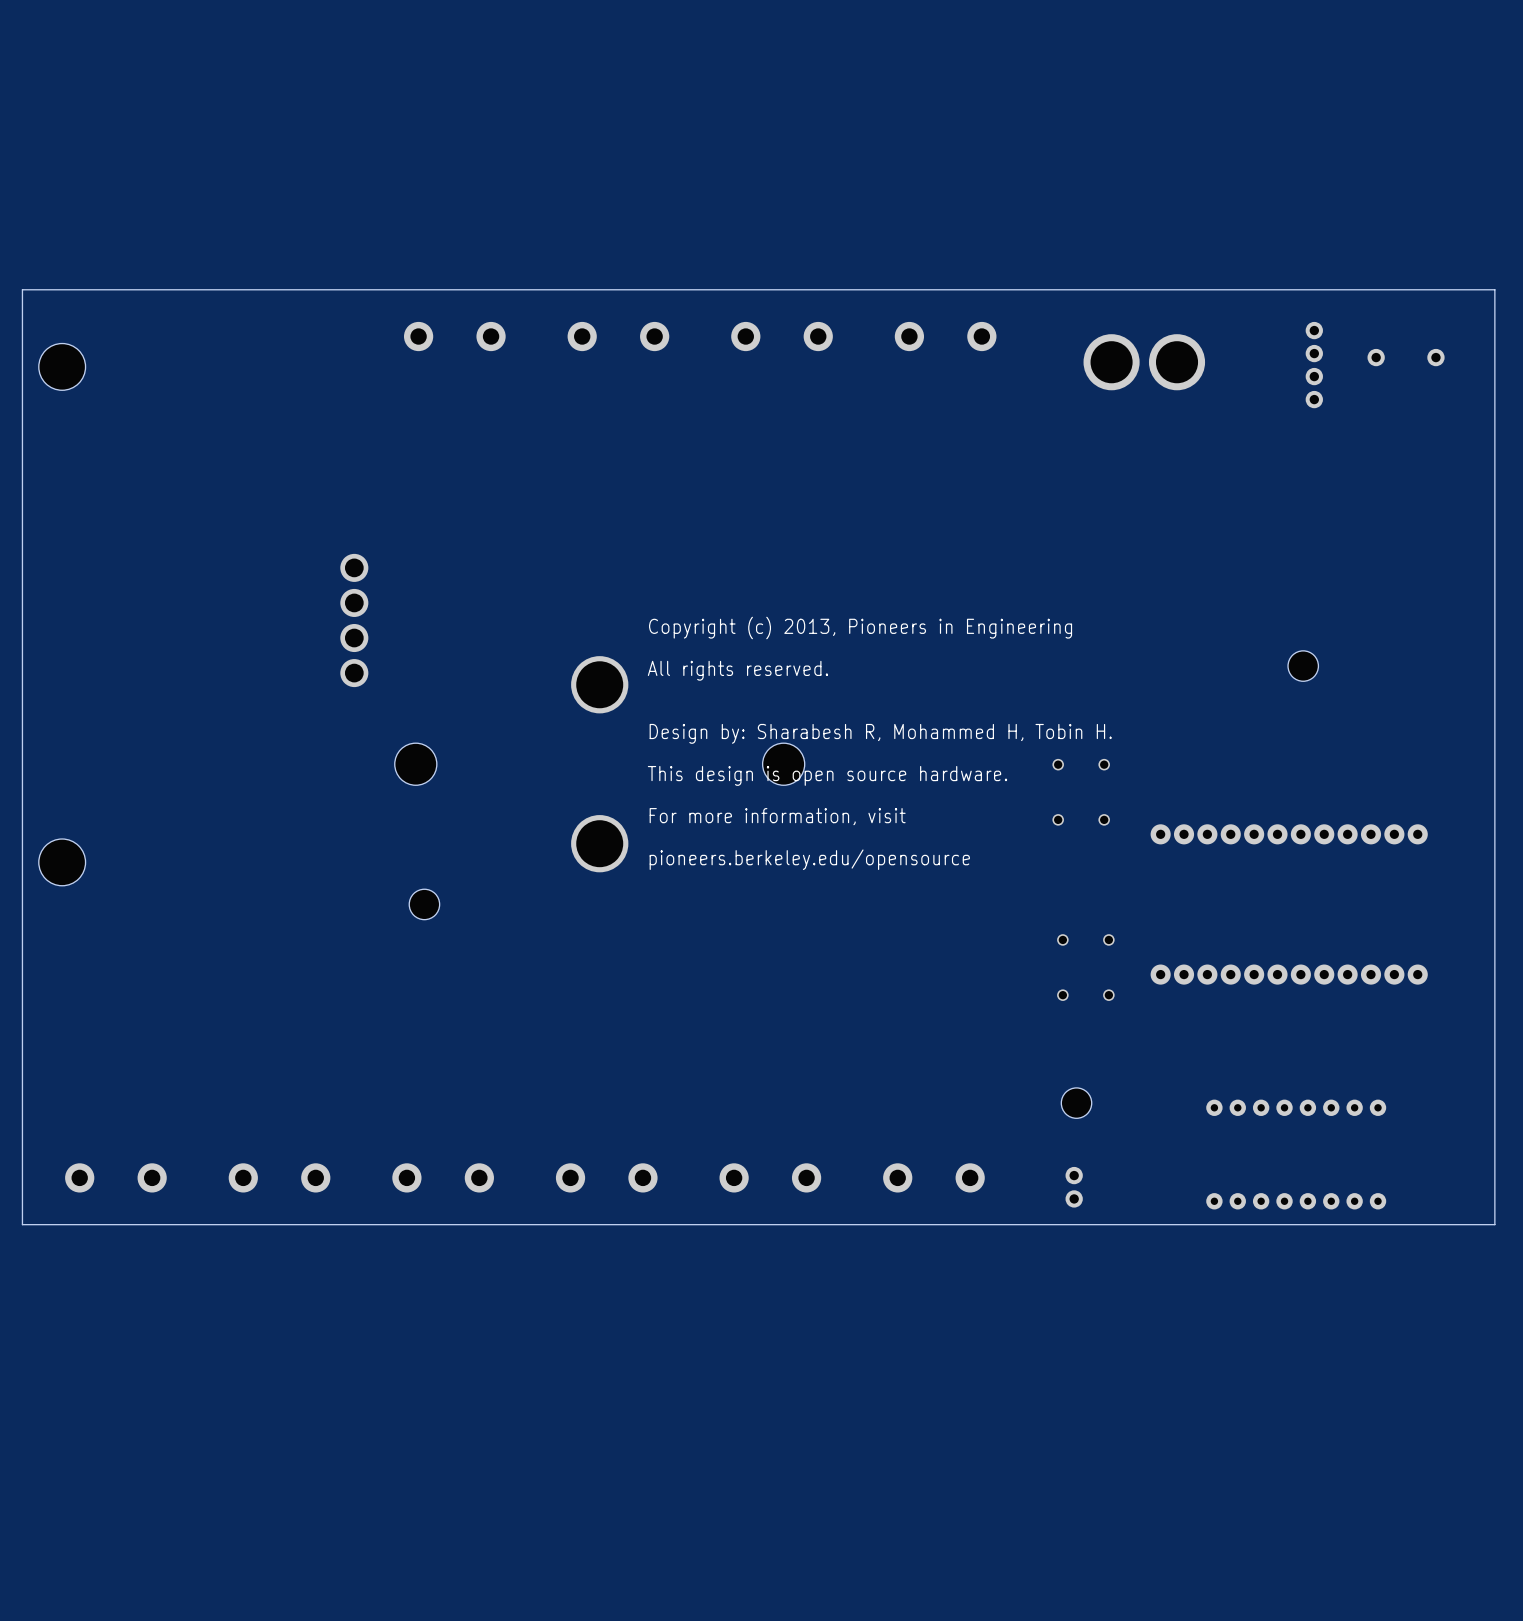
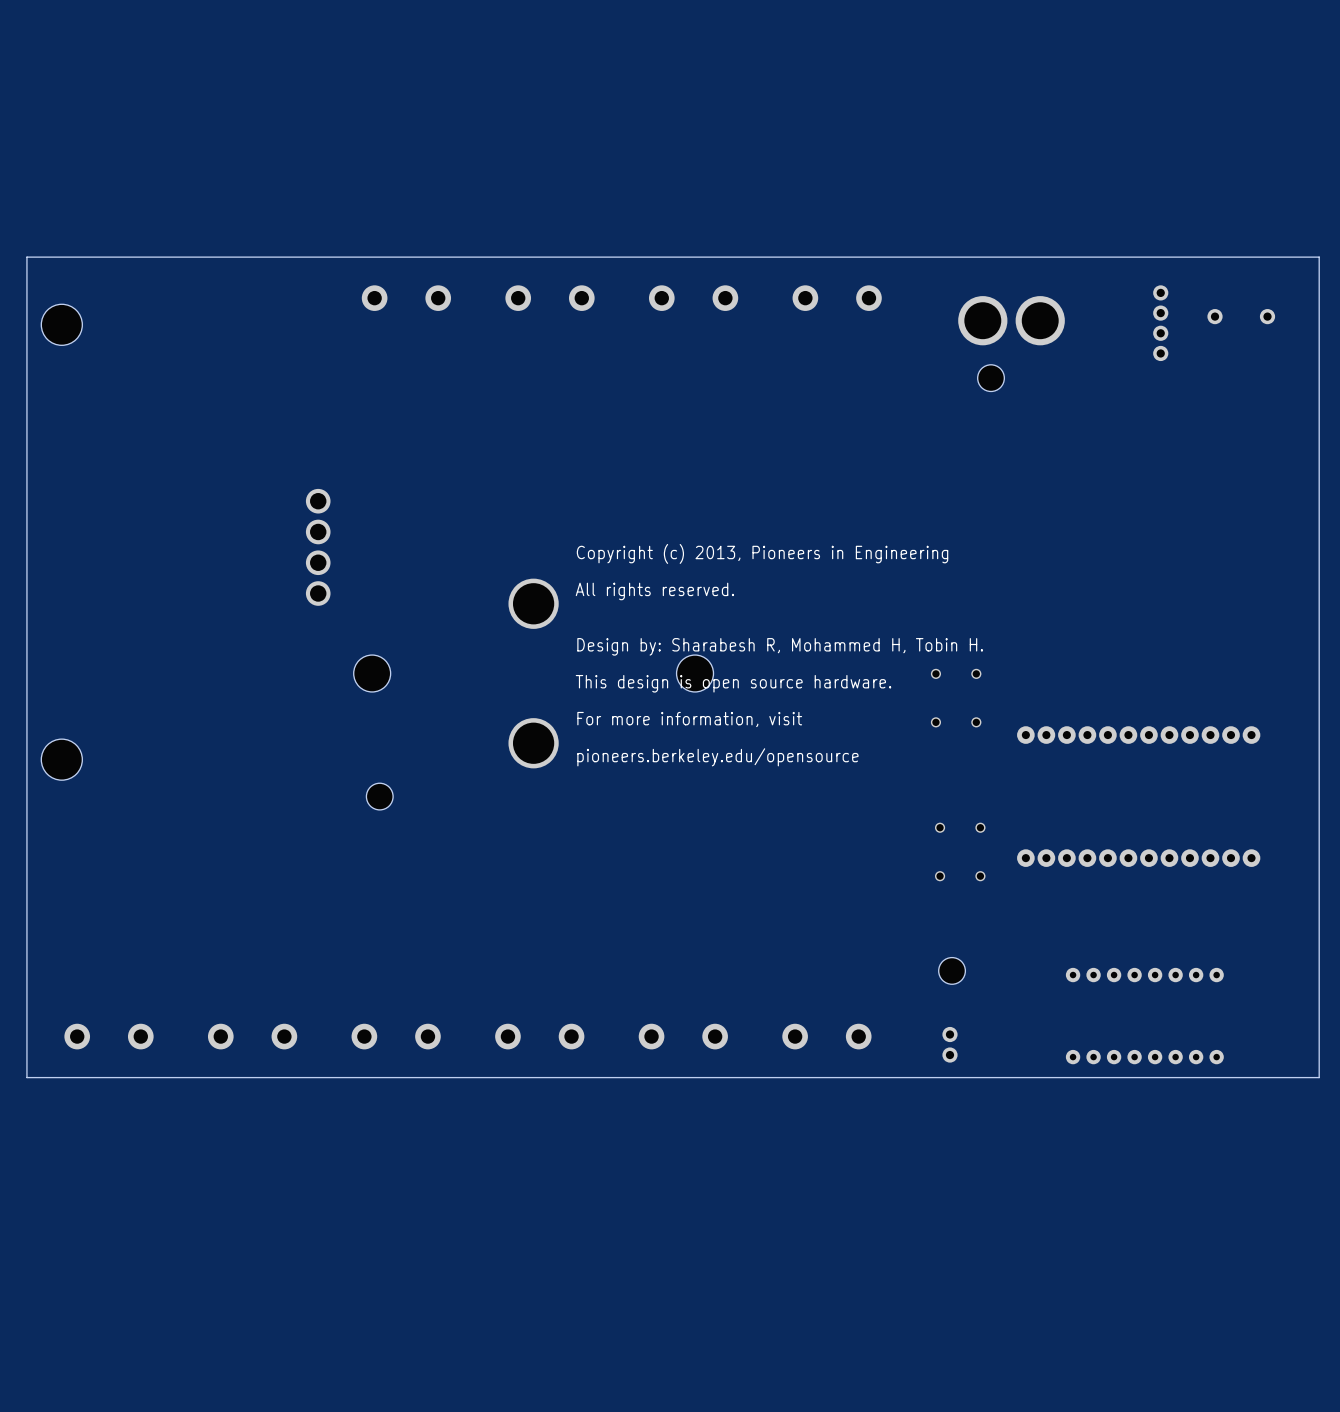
part: none -> (991, 378)
part: (1303, 666) -> none

